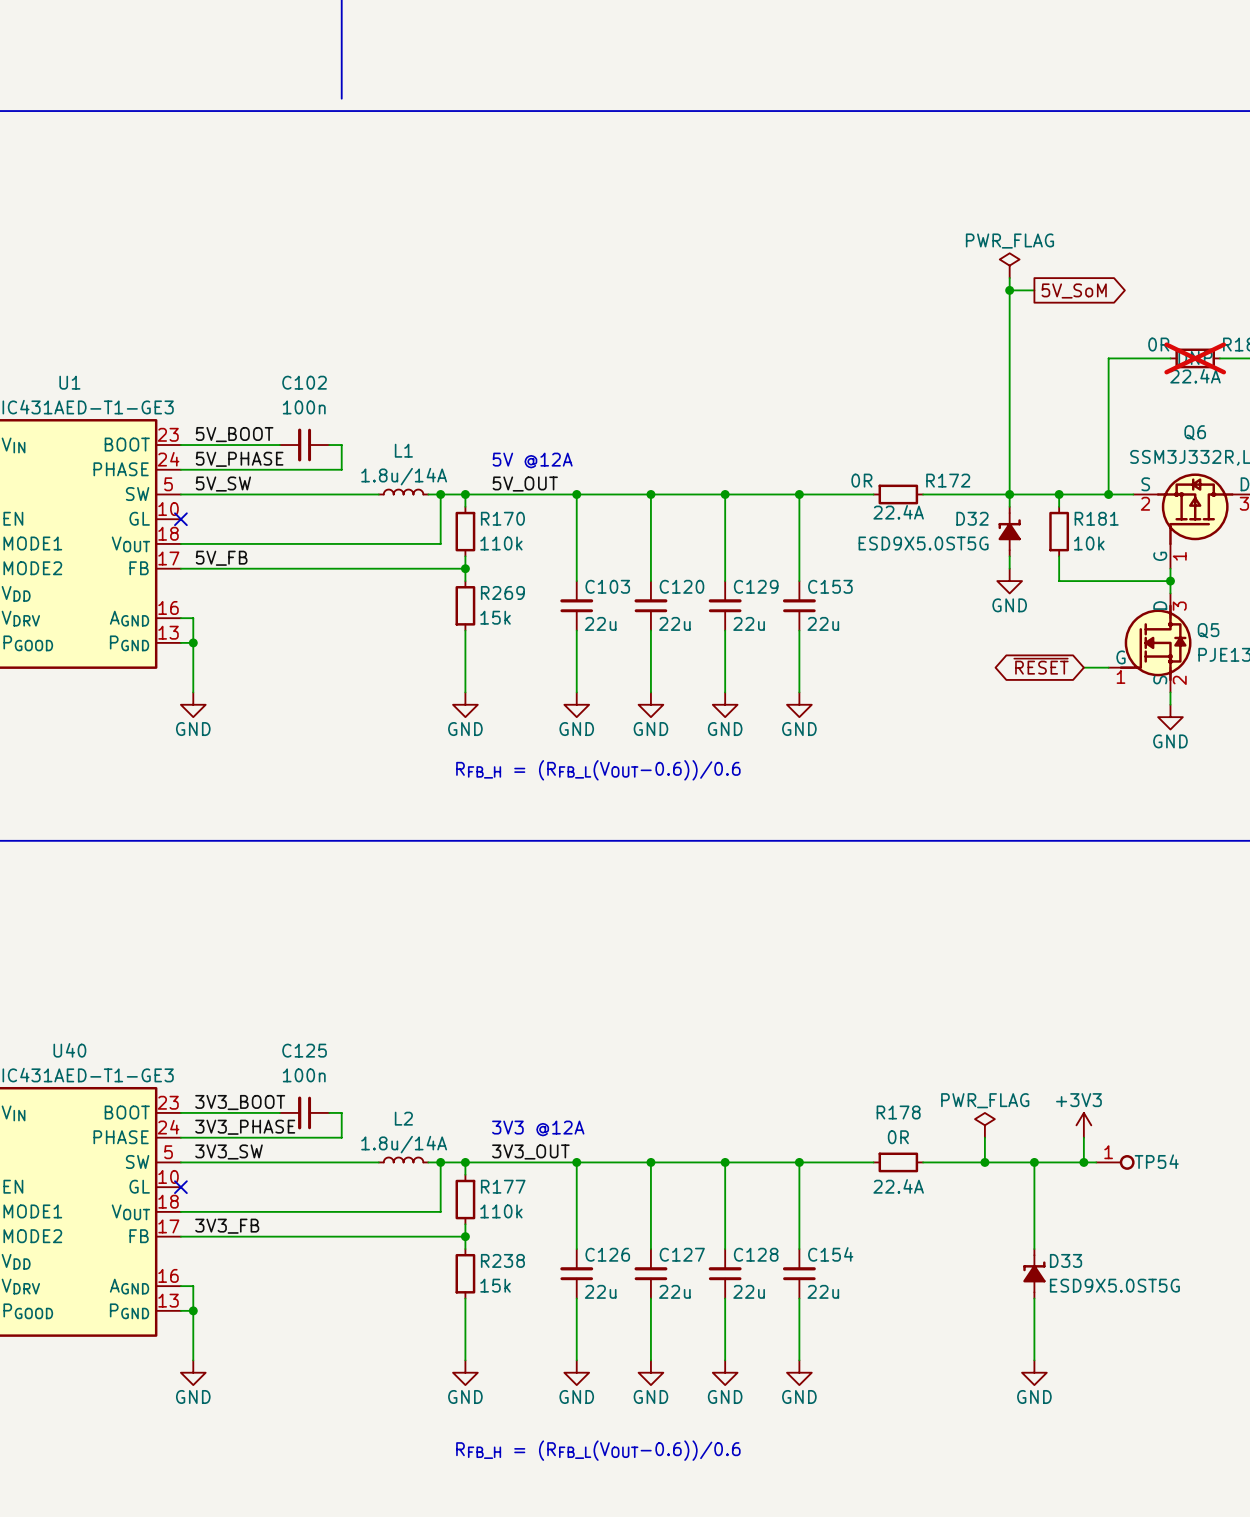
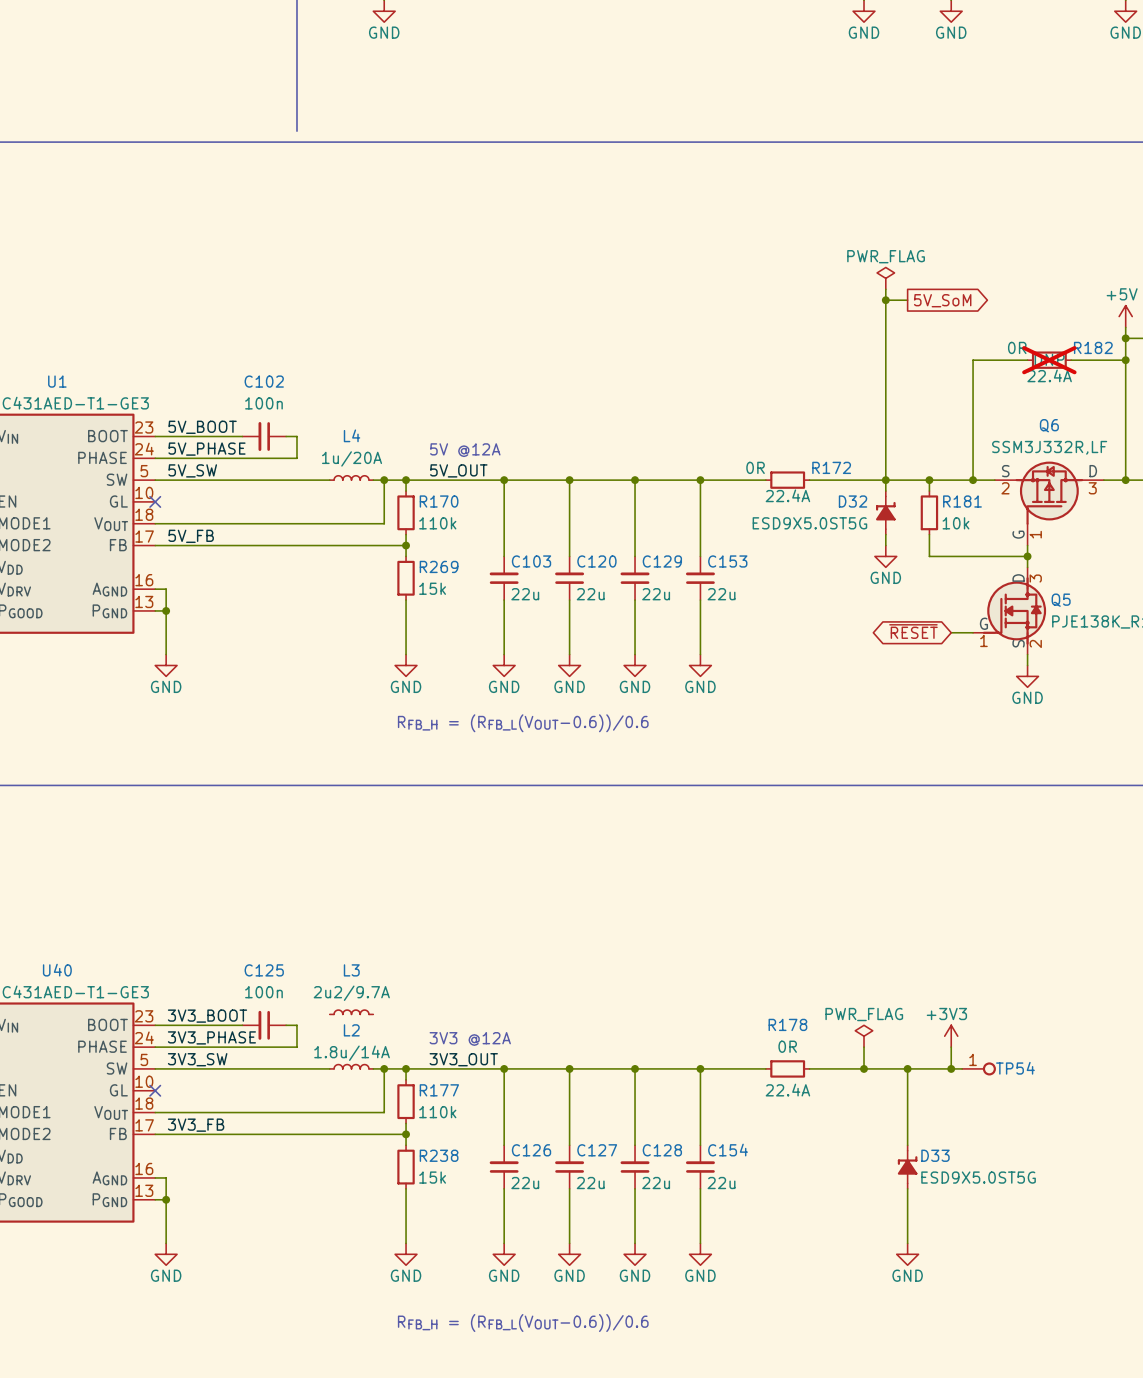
L1 name: L1 (403, 450) -> L4 (352, 435)
L1 text: 1.8u/14A (404, 476) -> 1u/20A (352, 458)
L3: none -> (351, 1012)

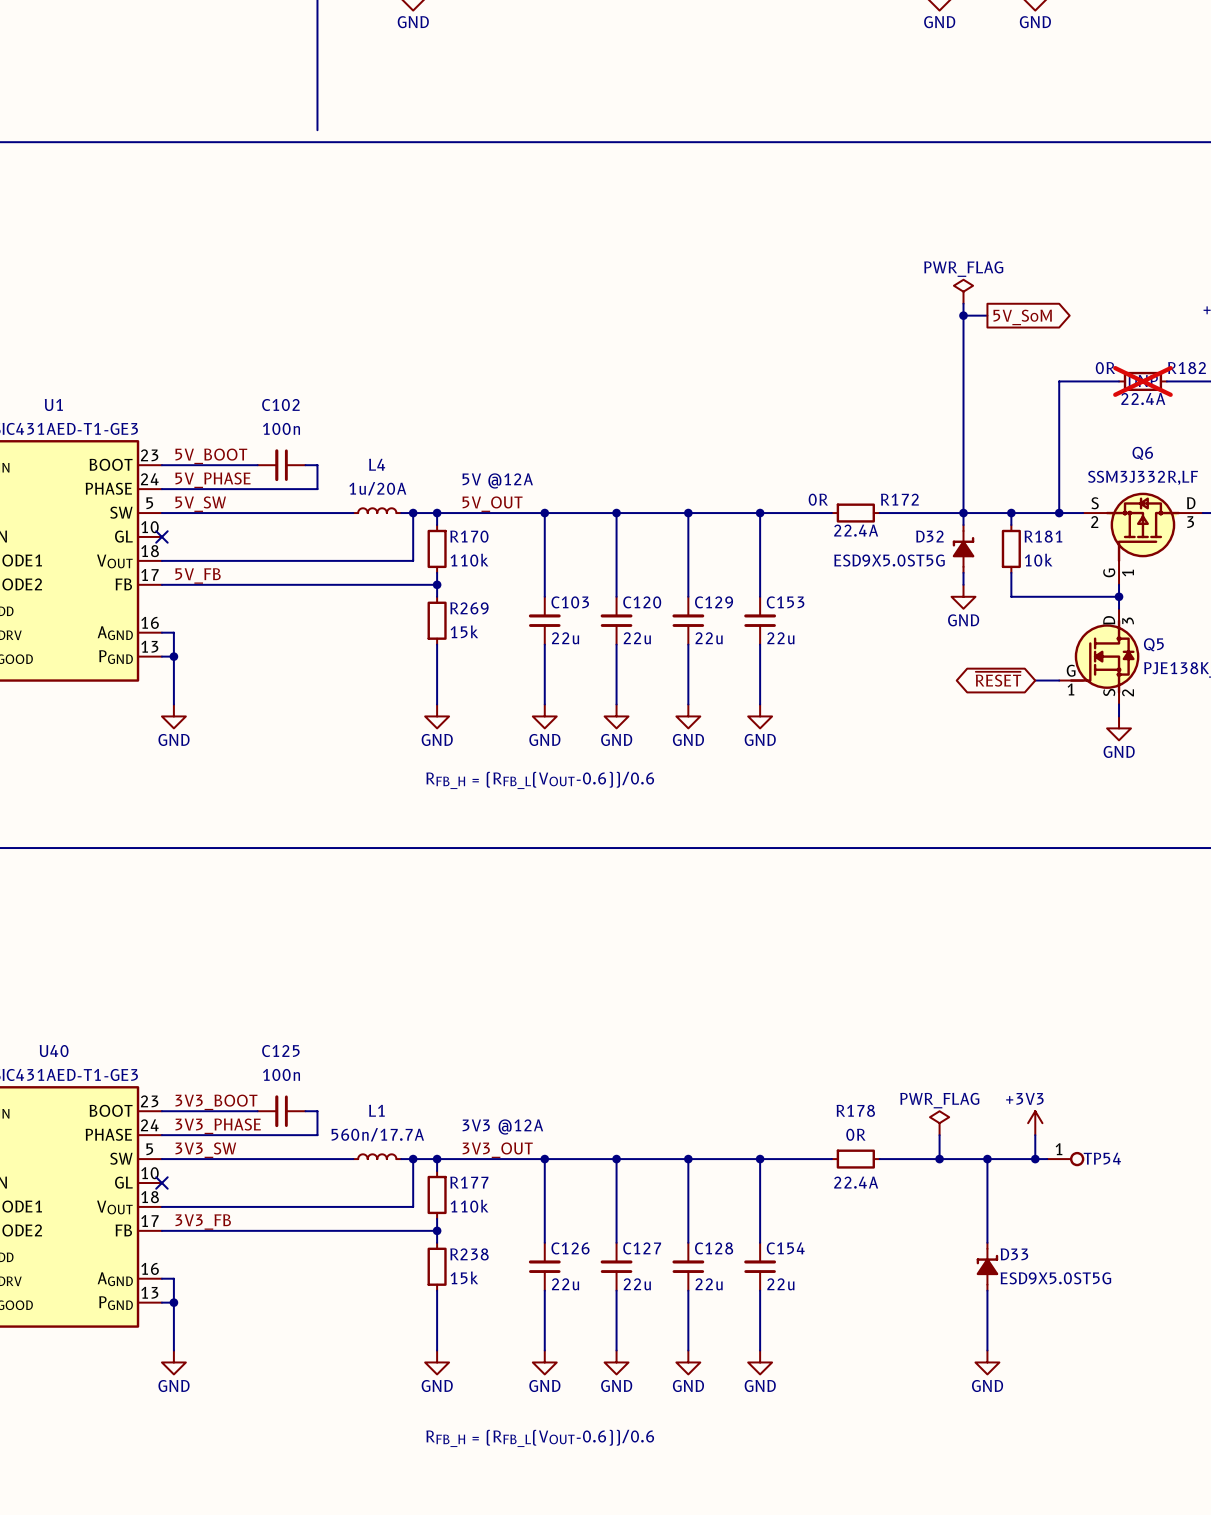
L3: (351, 1012) -> none
L2 name: L2 (351, 1030) -> L1 (376, 1110)
L2 text: 1.8u/14A (352, 1053) -> 560n/17.7A (377, 1134)

